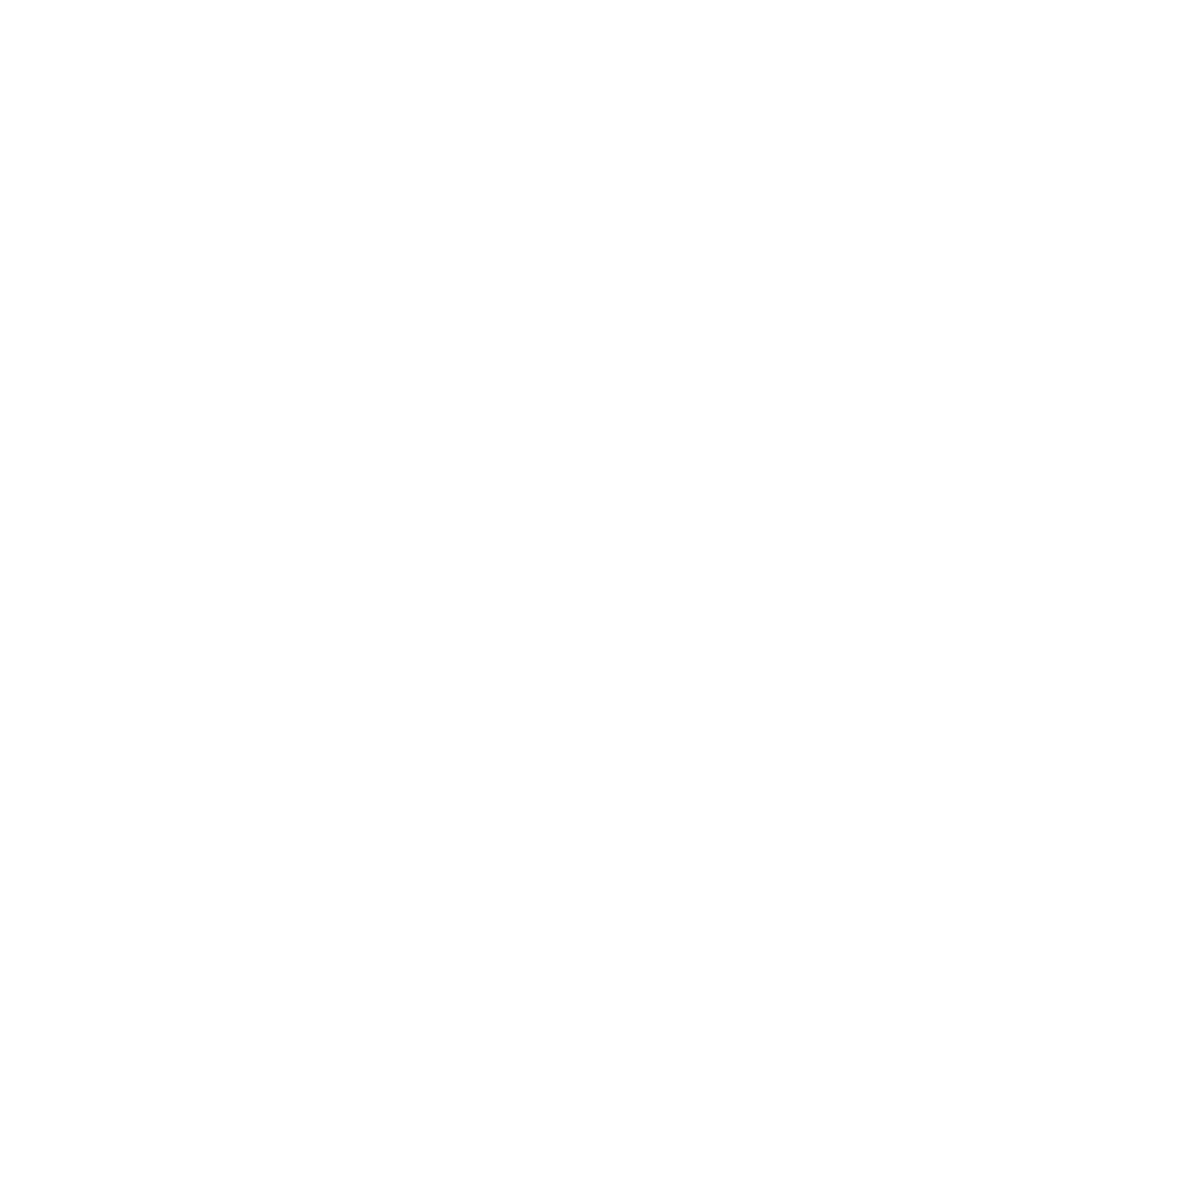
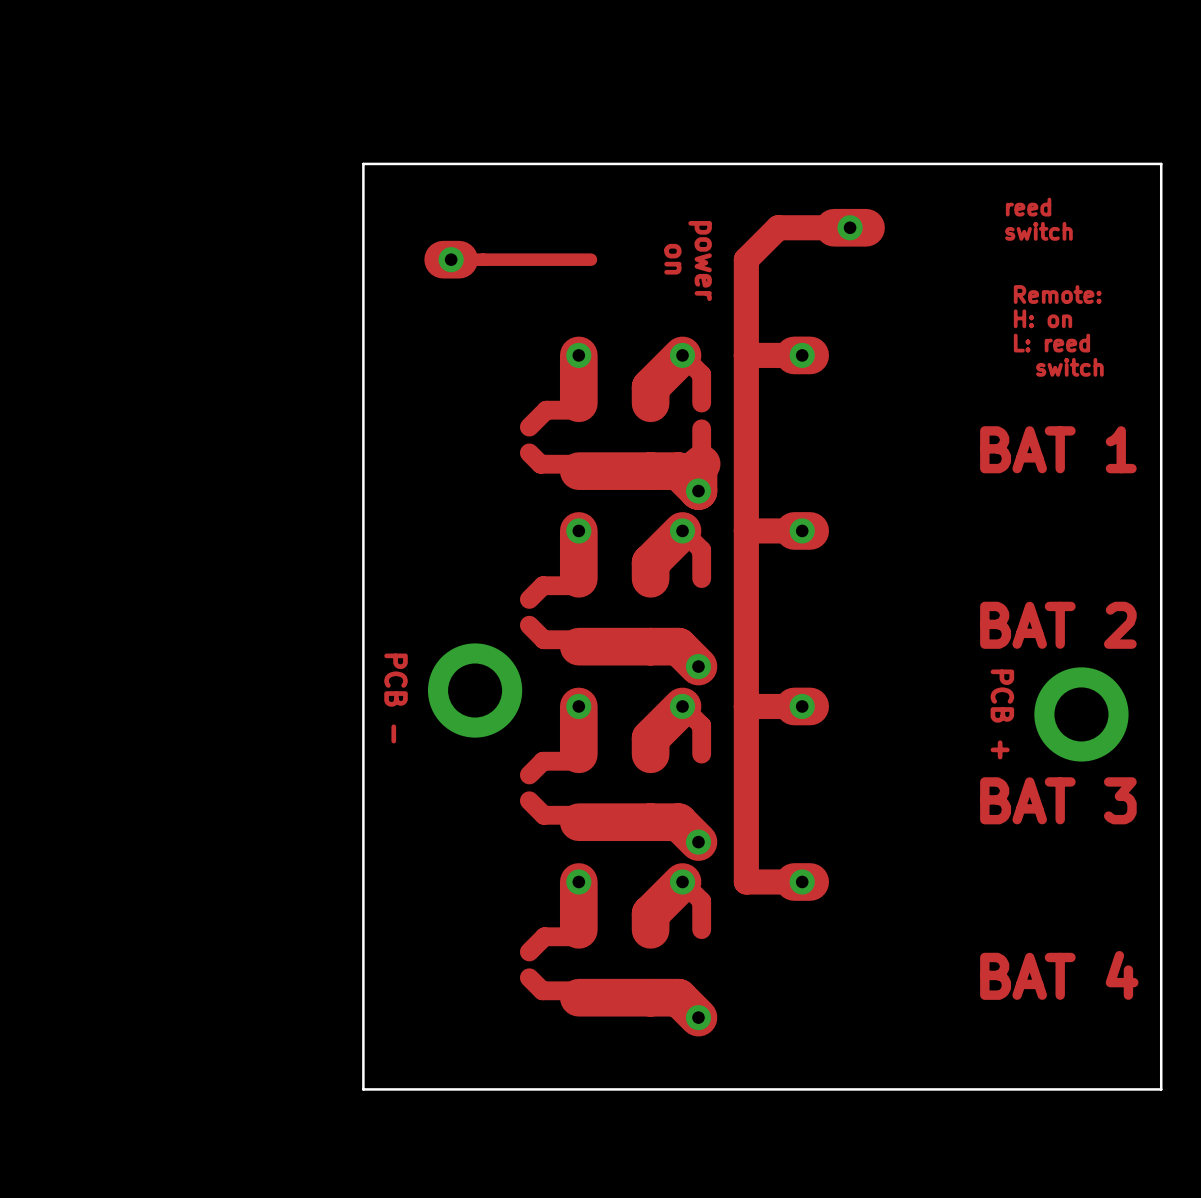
board edge: none -> (363, 163) (363, 1089) (1161, 1089) (1161, 163) (363, 163)
text: none -> reed (1028, 207)
track: none -> (834, 227) (866, 227)
track: none -> (850, 227) (778, 227) (746, 259) (746, 881) (810, 881) (794, 881)
via: none -> (850, 227)
text: none -> switch (1038, 231)
track: none -> (443, 259) (459, 259)
track: none -> (451, 259) (590, 259)
via: none -> (451, 259)
text: none -> on (672, 259)
text: none -> power (700, 261)
text: none -> Remote: (1057, 294)
text: none -> H: on (1043, 318)
text: none -> L: reed (1051, 343)
track: none -> (578, 355) (578, 403)
via: none -> (578, 355)
via: none -> (682, 355)
track: none -> (746, 355) (810, 355) (794, 355)
via: none -> (802, 355)
text: none -> switch (1069, 367)
track: none -> (701, 403) (701, 374) (682, 355) (650, 387) (650, 403)
track: none -> (578, 410) (546, 410) (529, 427)
track: none -> (701, 428) (701, 463) (698, 467) (698, 491) (678, 471) (578, 471)
text: none -> BAT 1 (1058, 449)
track: none -> (529, 452) (540, 464) (578, 464)
via: none -> (698, 491)
track: none -> (578, 530) (578, 578)
via: none -> (578, 530)
via: none -> (682, 530)
track: none -> (746, 530) (810, 530) (794, 530)
via: none -> (802, 530)
track: none -> (701, 578) (701, 550) (682, 530) (650, 562) (650, 578)
track: none -> (578, 585) (543, 585) (529, 599)
track: none -> (529, 625) (543, 639) (578, 639)
text: none -> BAT 2 (1058, 625)
track: none -> (578, 646) (678, 646) (698, 666)
via: none -> (698, 666)
part: none -> (475, 690)
text: none -> PCB - (396, 698)
track: none -> (578, 706) (578, 754)
via: none -> (578, 706)
via: none -> (682, 706)
track: none -> (746, 706) (810, 706) (794, 706)
via: none -> (802, 706)
text: none -> PCB + (1002, 714)
part: none -> (1081, 714)
track: none -> (701, 754) (701, 725) (682, 706) (650, 738) (650, 754)
track: none -> (578, 761) (543, 761) (529, 774)
track: none -> (529, 800) (543, 815) (578, 815)
text: none -> BAT 3 (1058, 800)
track: none -> (578, 822) (678, 822) (698, 842)
via: none -> (698, 842)
track: none -> (578, 881) (578, 929)
via: none -> (578, 881)
via: none -> (682, 881)
via: none -> (802, 881)
track: none -> (701, 929) (701, 901) (682, 881) (650, 913) (650, 929)
track: none -> (578, 936) (544, 936) (529, 951)
text: none -> BAT 4 (1059, 975)
track: none -> (529, 977) (542, 990) (578, 990)
track: none -> (578, 997) (678, 997) (698, 1017)
via: none -> (698, 1017)

